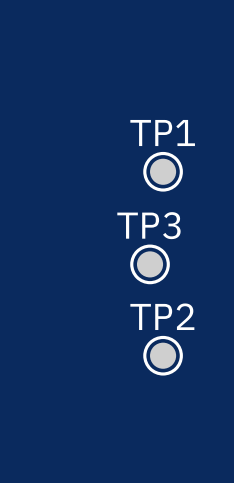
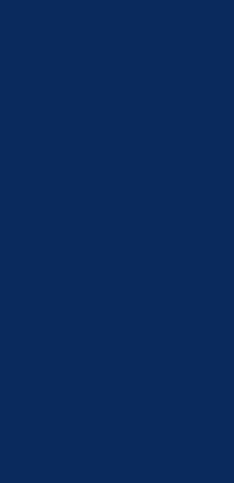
TP1: (163, 171) -> none
TP3: (150, 264) -> none
TP2: (163, 355) -> none

